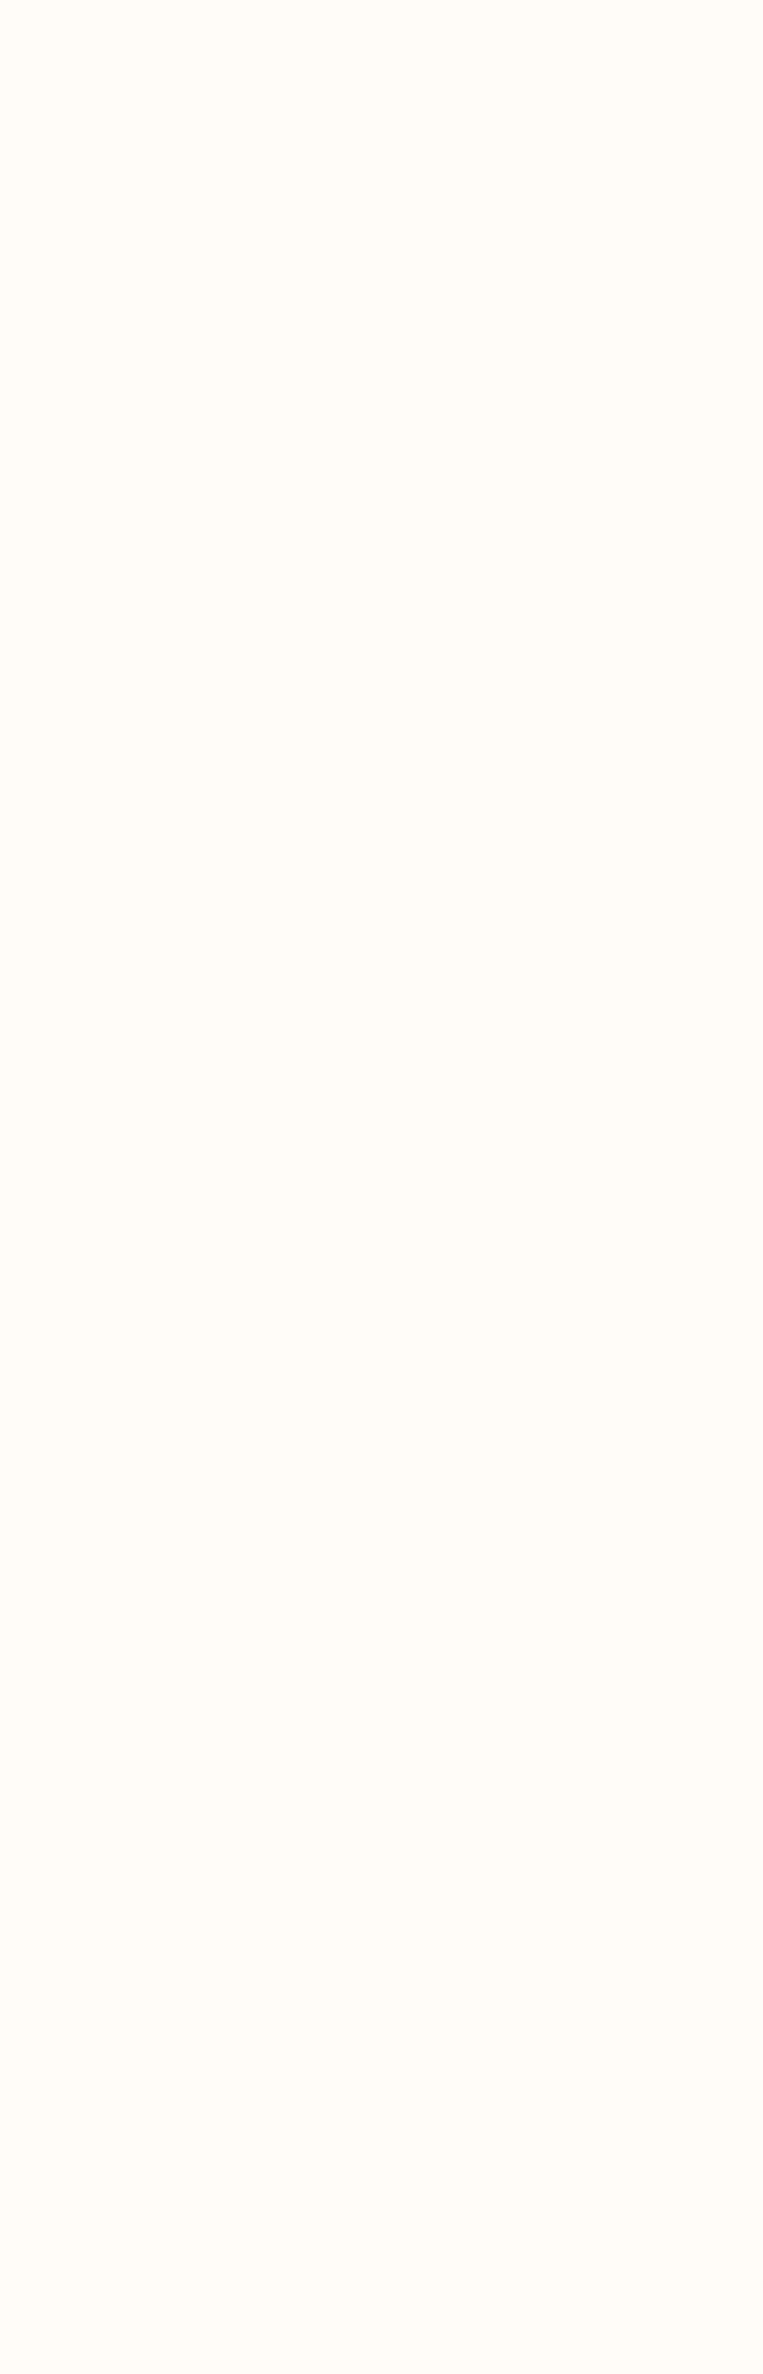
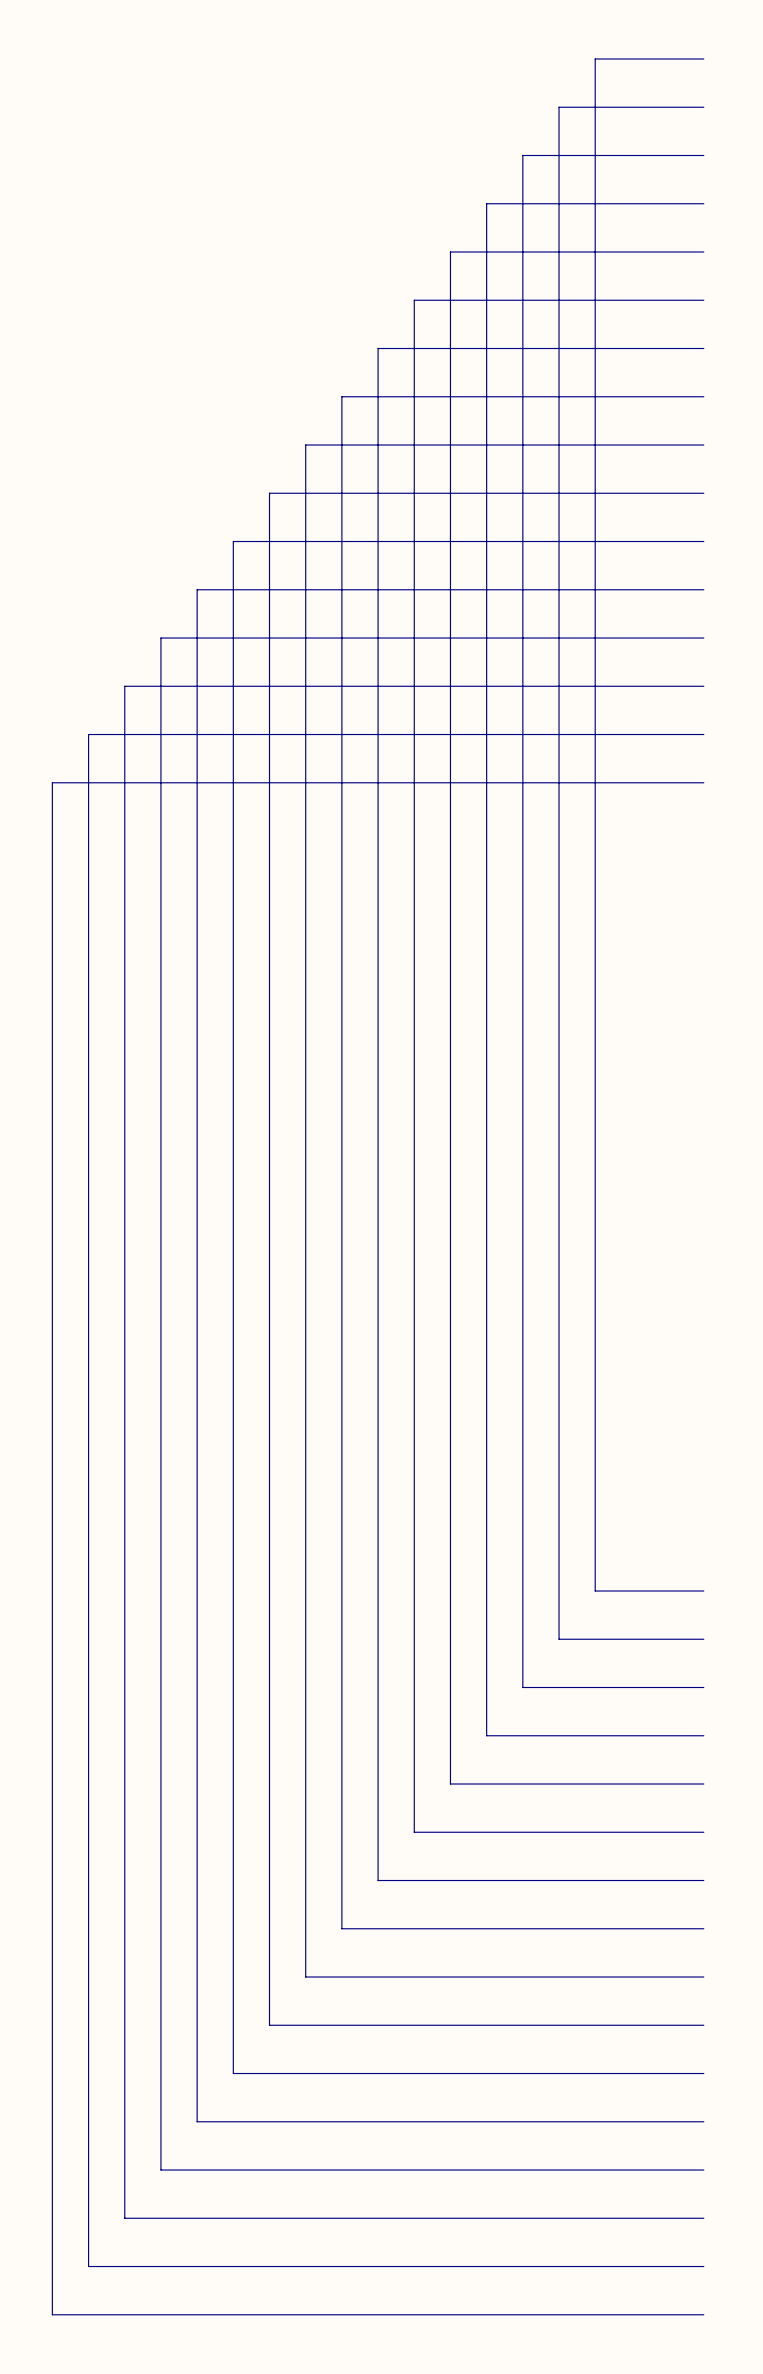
wire: none -> (703, 58) (595, 58) (595, 1590) (703, 1590)
wire: none -> (703, 107) (559, 107) (559, 1639) (703, 1639)
wire: none -> (703, 155) (522, 155) (522, 1687) (703, 1687)
wire: none -> (703, 203) (486, 203) (486, 1735) (703, 1735)
wire: none -> (703, 252) (450, 252) (450, 1784) (703, 1784)
wire: none -> (703, 300) (414, 300) (414, 1832) (703, 1832)
wire: none -> (703, 348) (378, 348) (378, 1880) (703, 1880)
wire: none -> (703, 396) (341, 396) (341, 1928) (703, 1928)
wire: none -> (703, 445) (305, 445) (305, 1977) (703, 1977)
wire: none -> (703, 493) (269, 493) (269, 2025) (703, 2025)
wire: none -> (703, 541) (233, 541) (233, 2073) (703, 2073)
wire: none -> (703, 589) (197, 589) (197, 2121) (703, 2121)
wire: none -> (703, 638) (160, 638) (160, 2170) (703, 2170)
wire: none -> (703, 686) (124, 686) (124, 2218) (703, 2218)
wire: none -> (703, 734) (88, 734) (88, 2266) (703, 2266)
wire: none -> (703, 782) (52, 782) (52, 2314) (703, 2314)

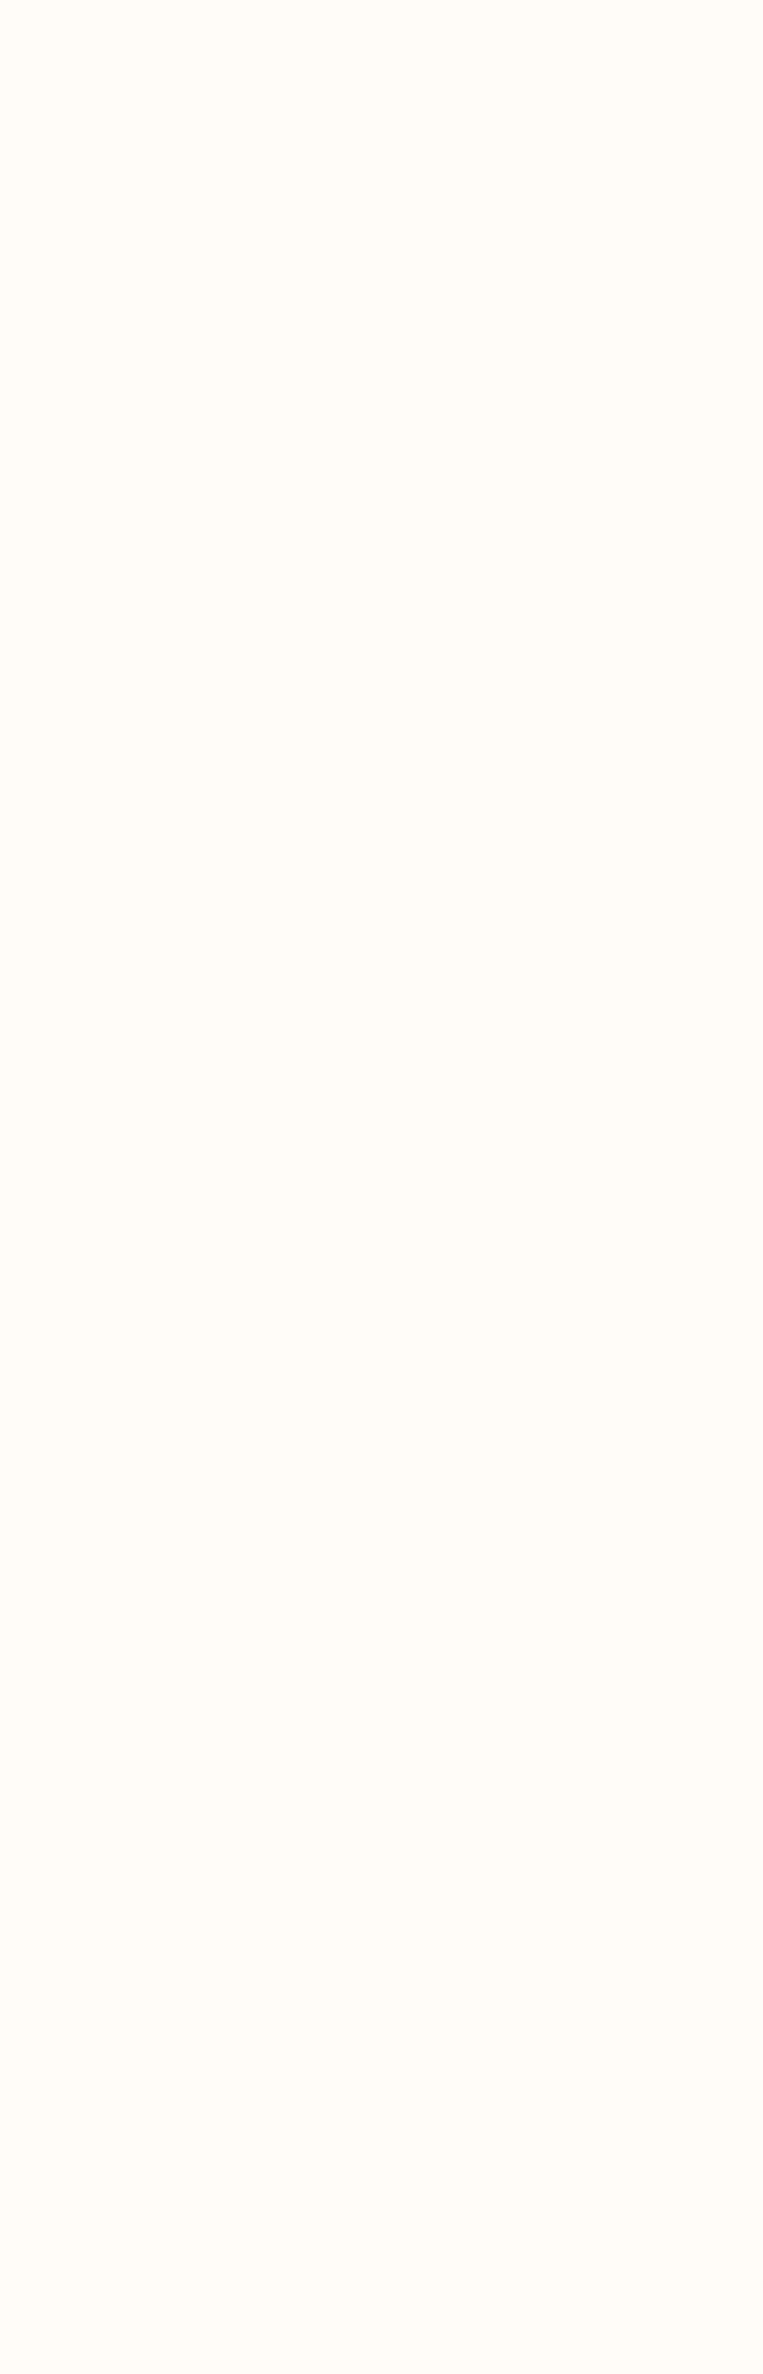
wire: (703, 58) (595, 58) (595, 1590) (703, 1590) -> none
wire: (703, 107) (559, 107) (559, 1639) (703, 1639) -> none
wire: (703, 155) (522, 155) (522, 1687) (703, 1687) -> none
wire: (703, 203) (486, 203) (486, 1735) (703, 1735) -> none
wire: (703, 252) (450, 252) (450, 1784) (703, 1784) -> none
wire: (703, 300) (414, 300) (414, 1832) (703, 1832) -> none
wire: (703, 348) (378, 348) (378, 1880) (703, 1880) -> none
wire: (703, 396) (341, 396) (341, 1928) (703, 1928) -> none
wire: (703, 445) (305, 445) (305, 1977) (703, 1977) -> none
wire: (703, 493) (269, 493) (269, 2025) (703, 2025) -> none
wire: (703, 541) (233, 541) (233, 2073) (703, 2073) -> none
wire: (703, 589) (197, 589) (197, 2121) (703, 2121) -> none
wire: (703, 638) (160, 638) (160, 2170) (703, 2170) -> none
wire: (703, 686) (124, 686) (124, 2218) (703, 2218) -> none
wire: (703, 734) (88, 734) (88, 2266) (703, 2266) -> none
wire: (703, 782) (52, 782) (52, 2314) (703, 2314) -> none

